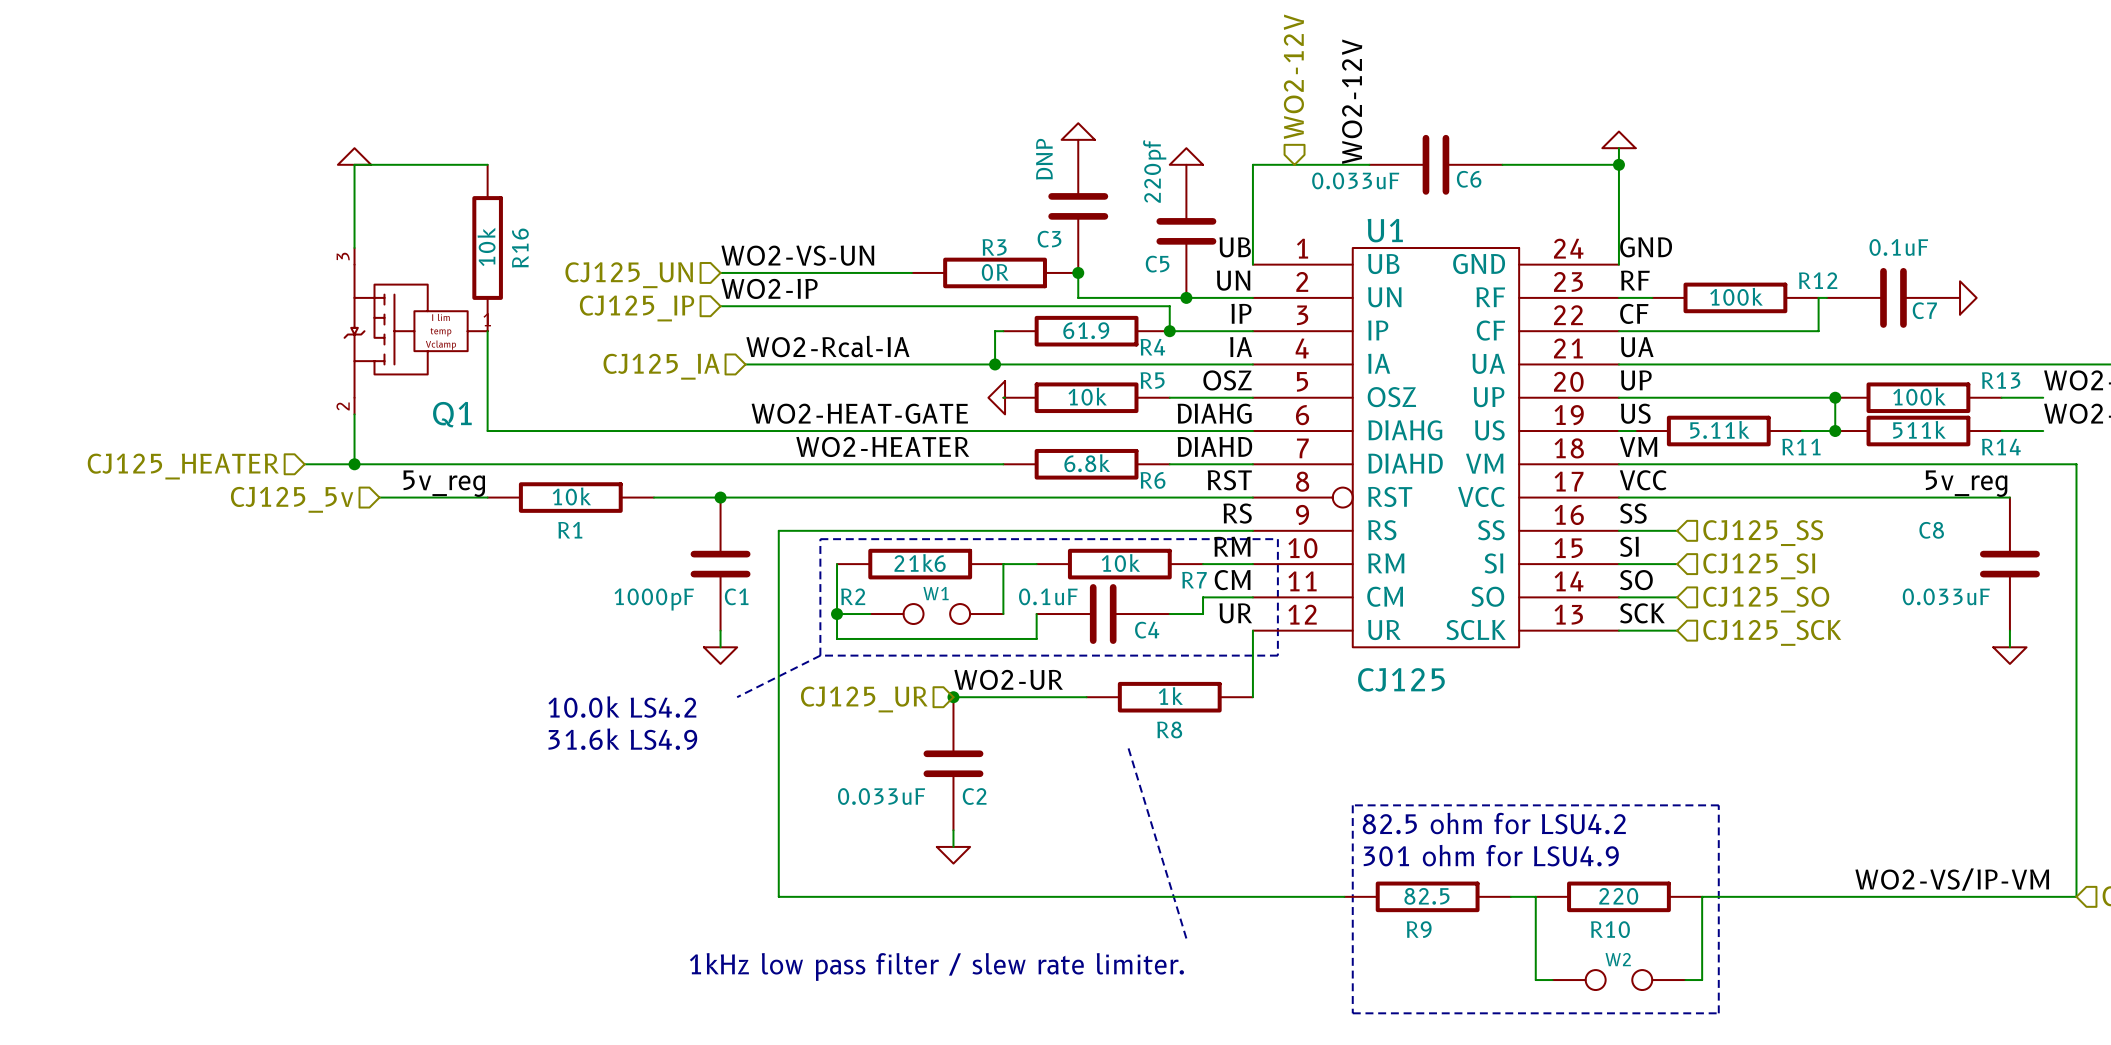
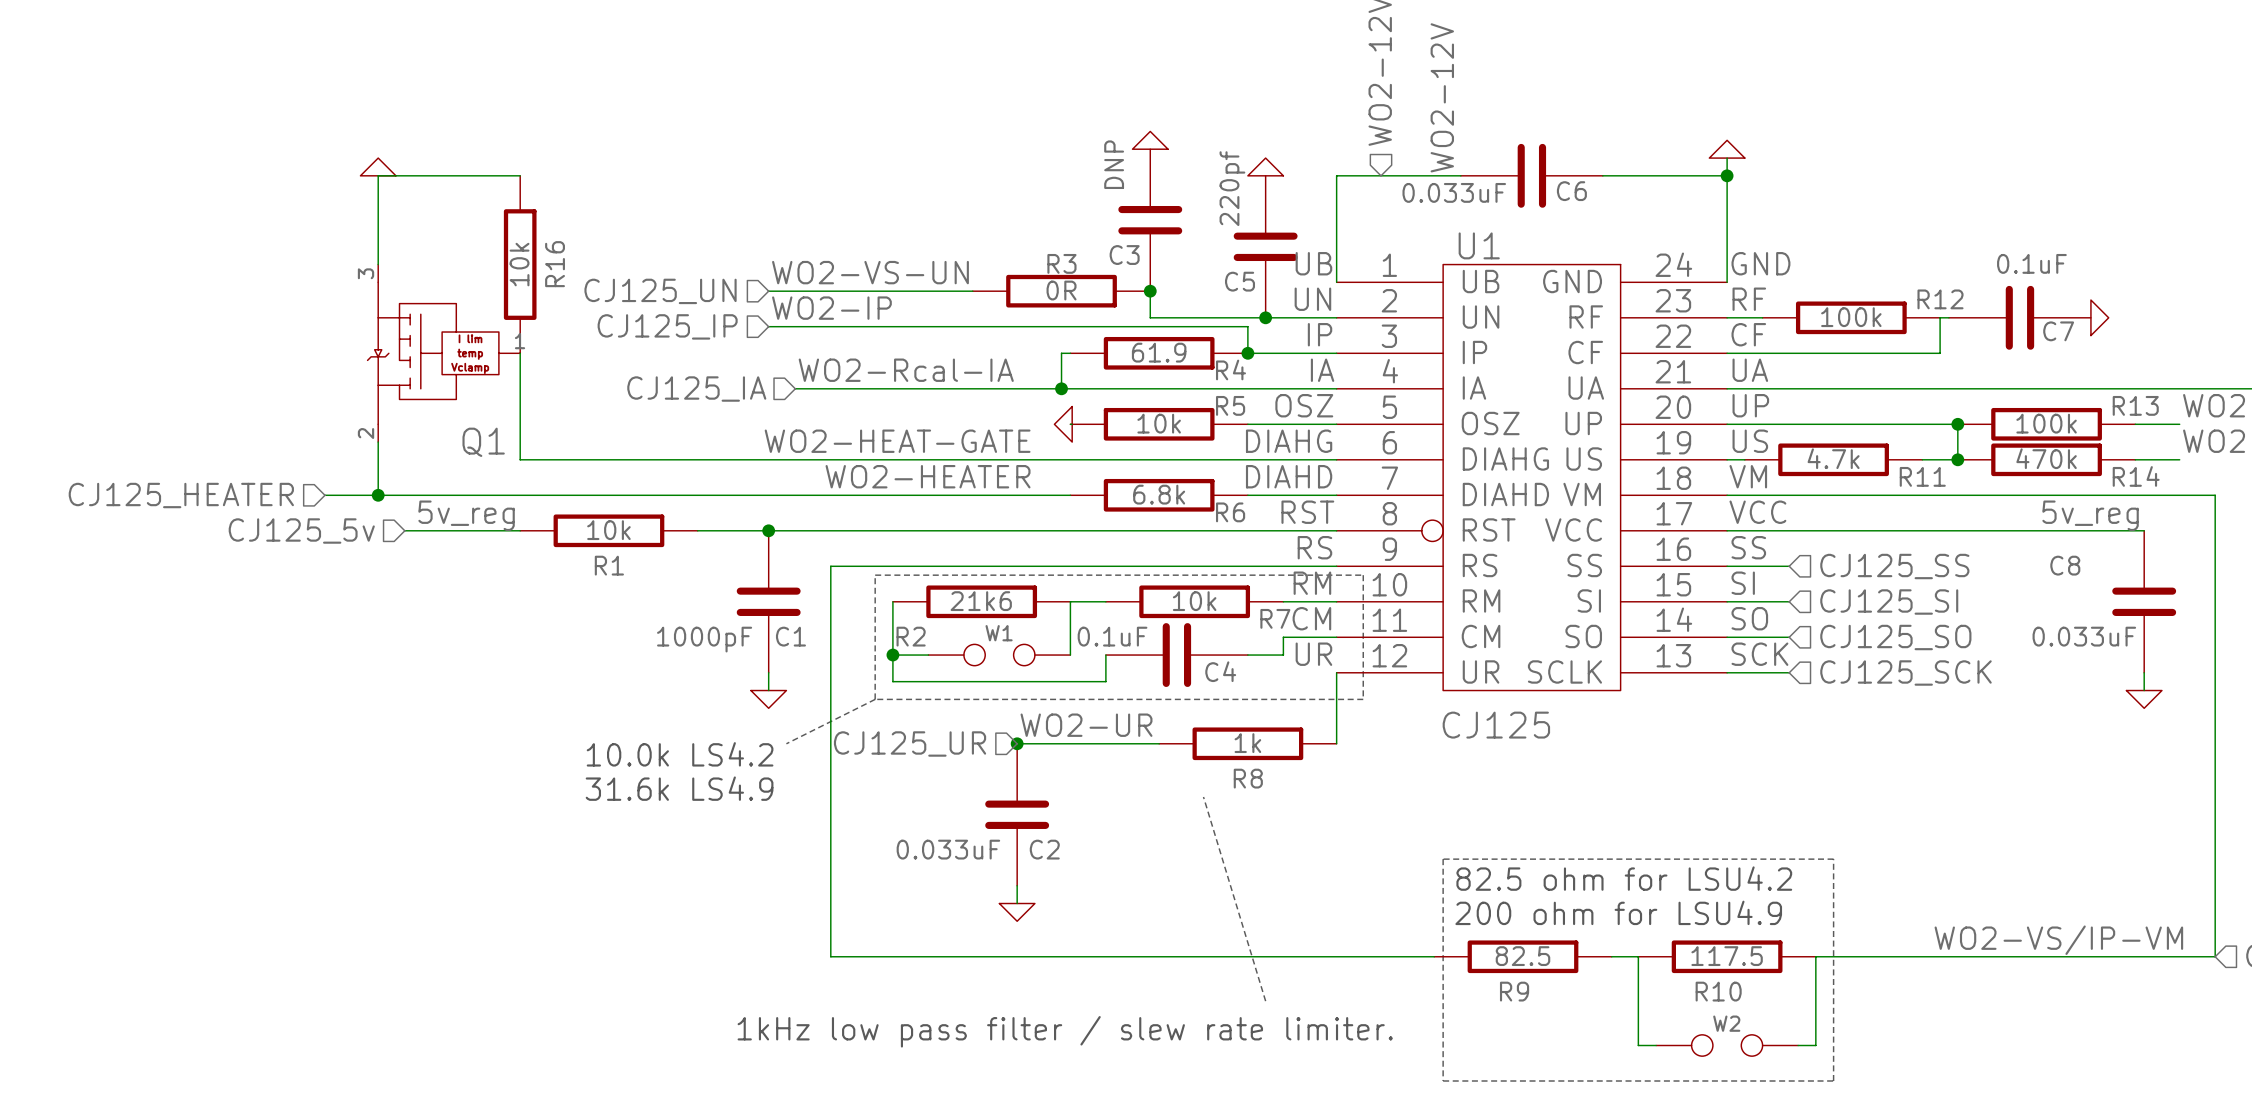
R11 value: 5.11k (1719, 429) -> 4.7k (1833, 458)
R14 value: 511k (1919, 429) -> 470k (2046, 458)
text: 301 ohm for LSU4.9 (1491, 855) -> 200 ohm for LSU4.9 (1618, 912)
R10 value: 220 (1618, 896) -> 117.5 (1727, 956)

